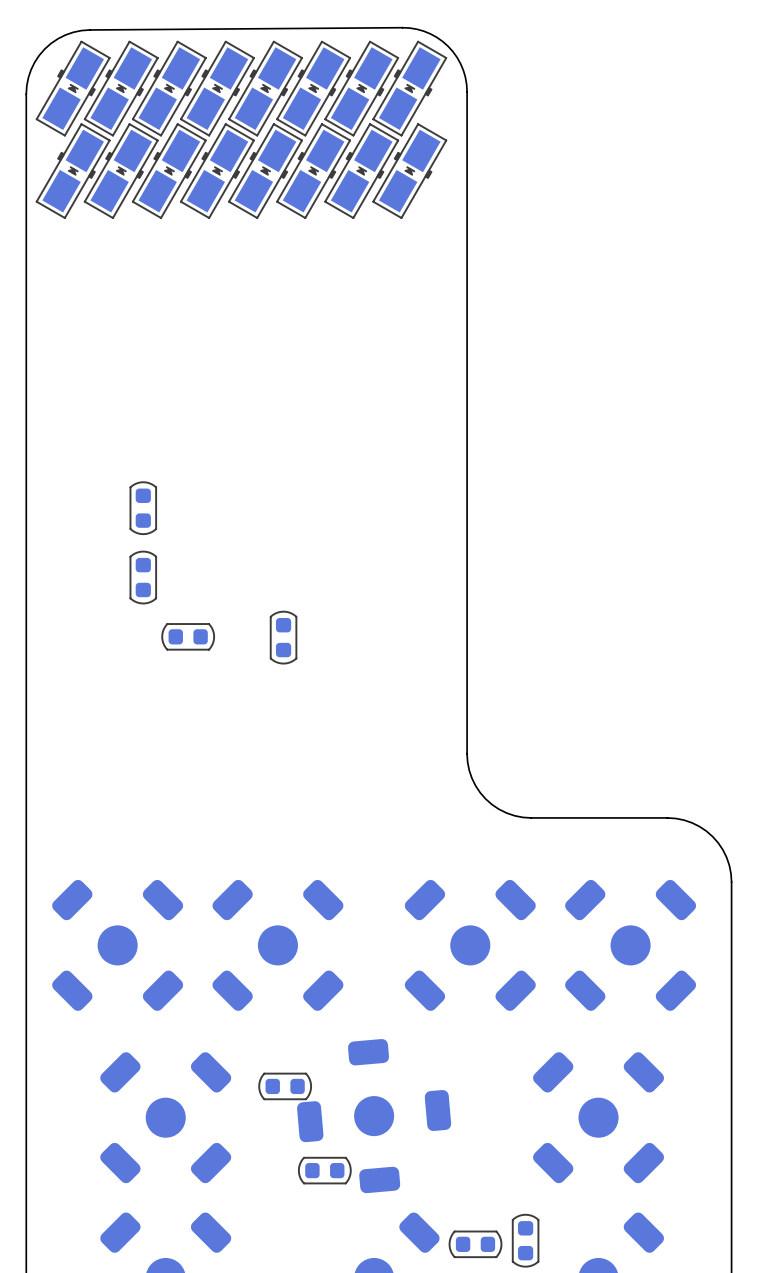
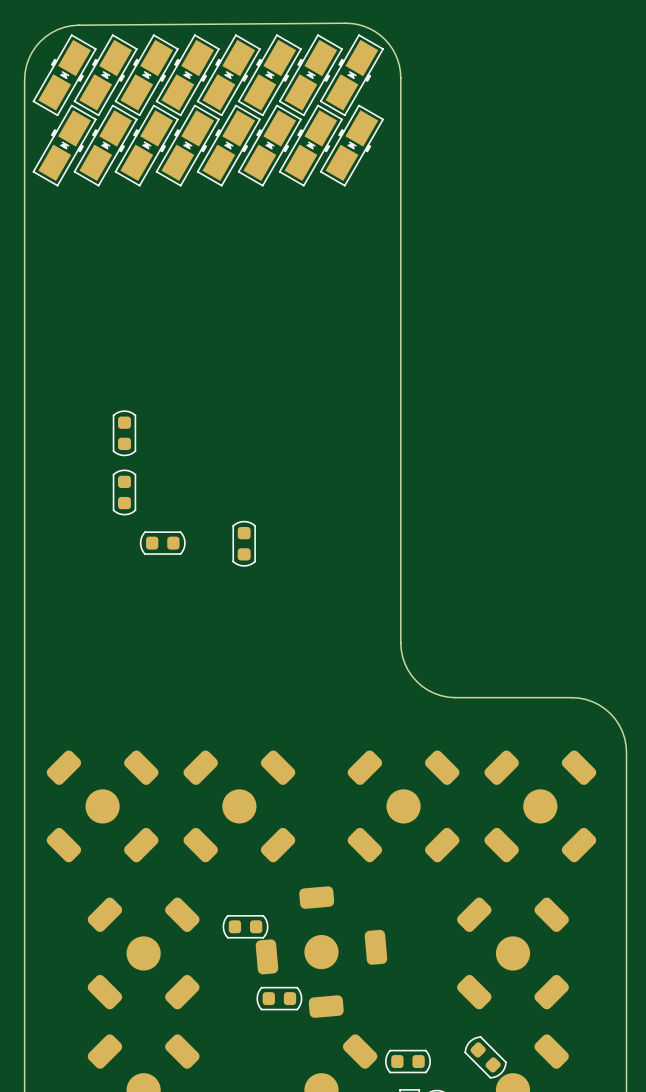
part: none -> (485, 1057)
part: (525, 1240) -> none

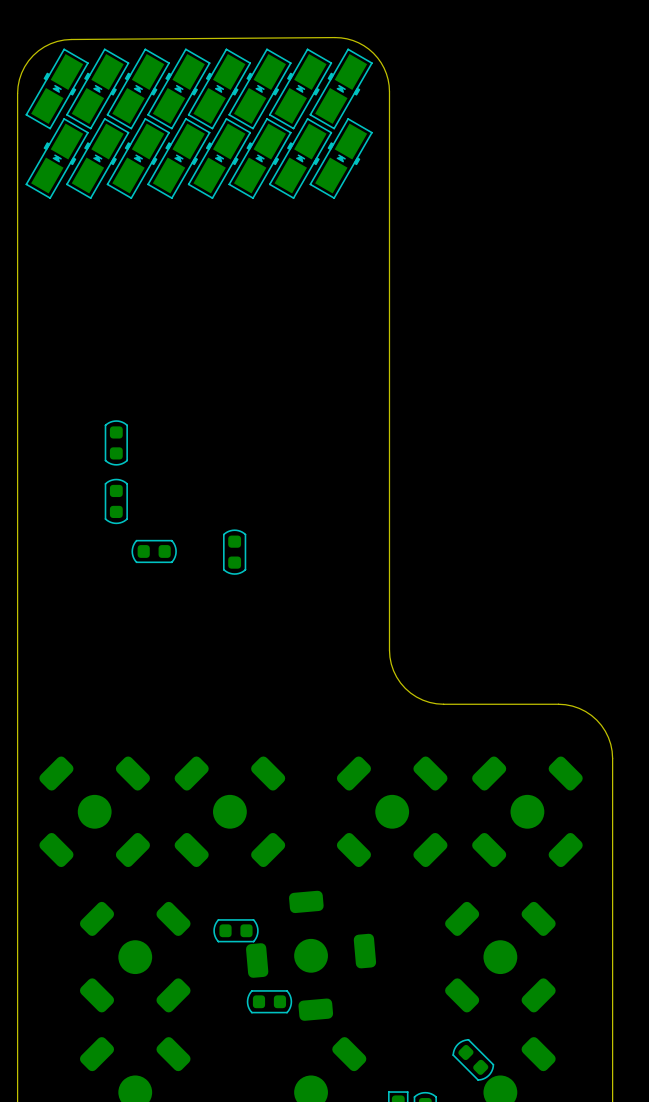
part: (407, 1061) -> none

